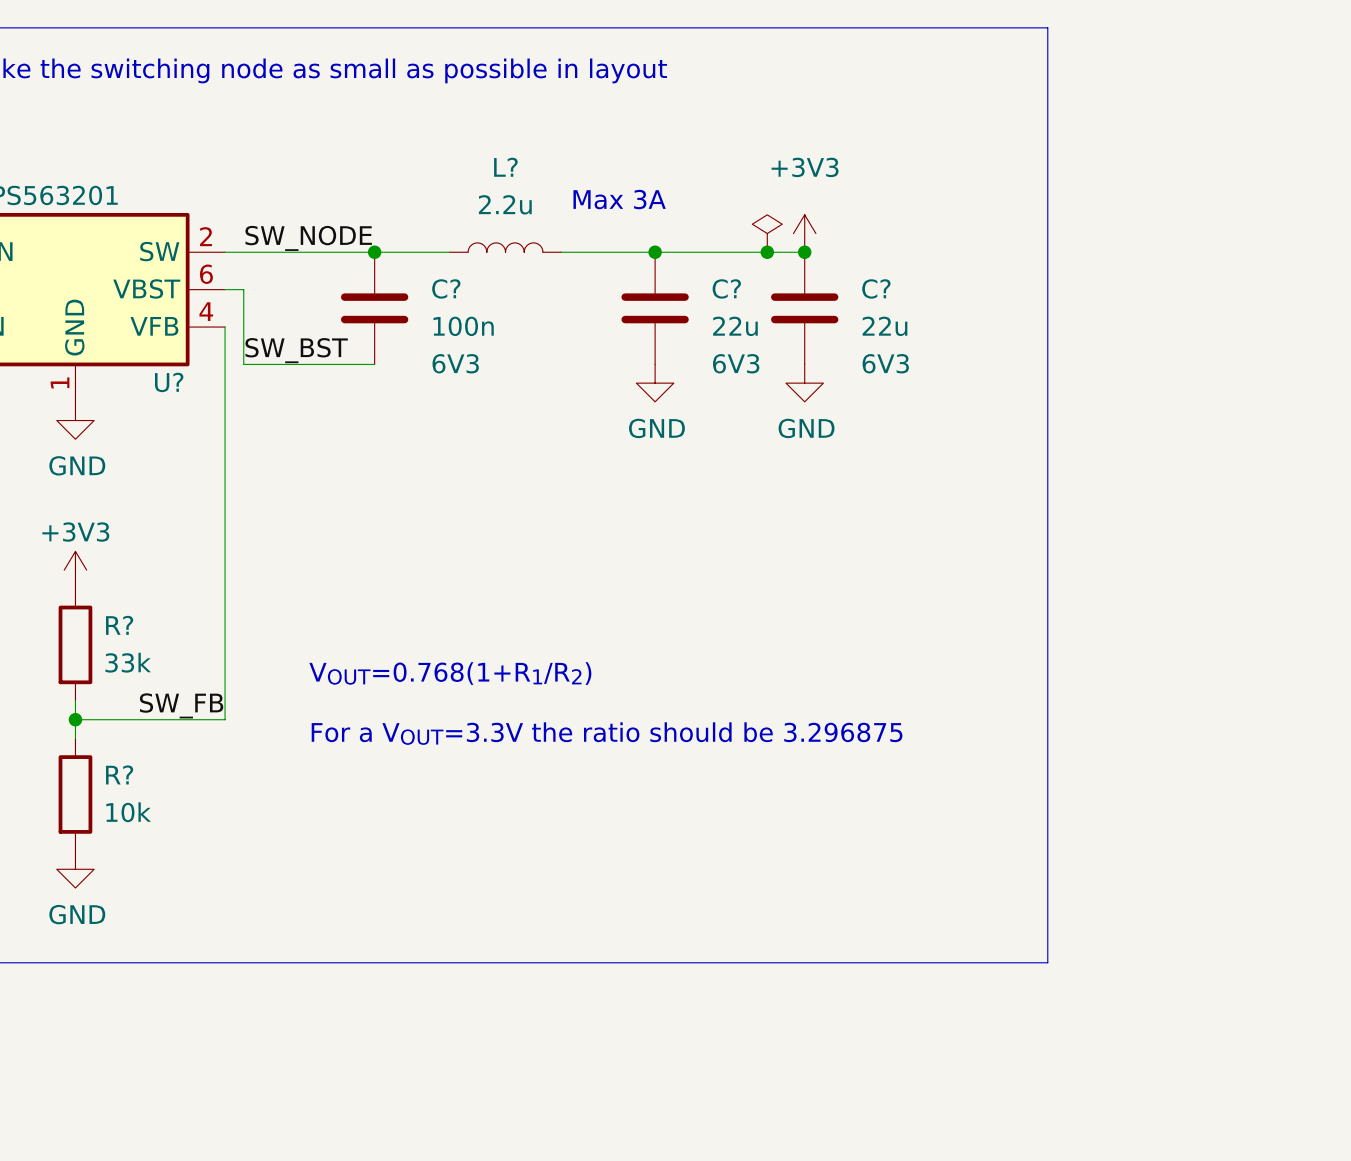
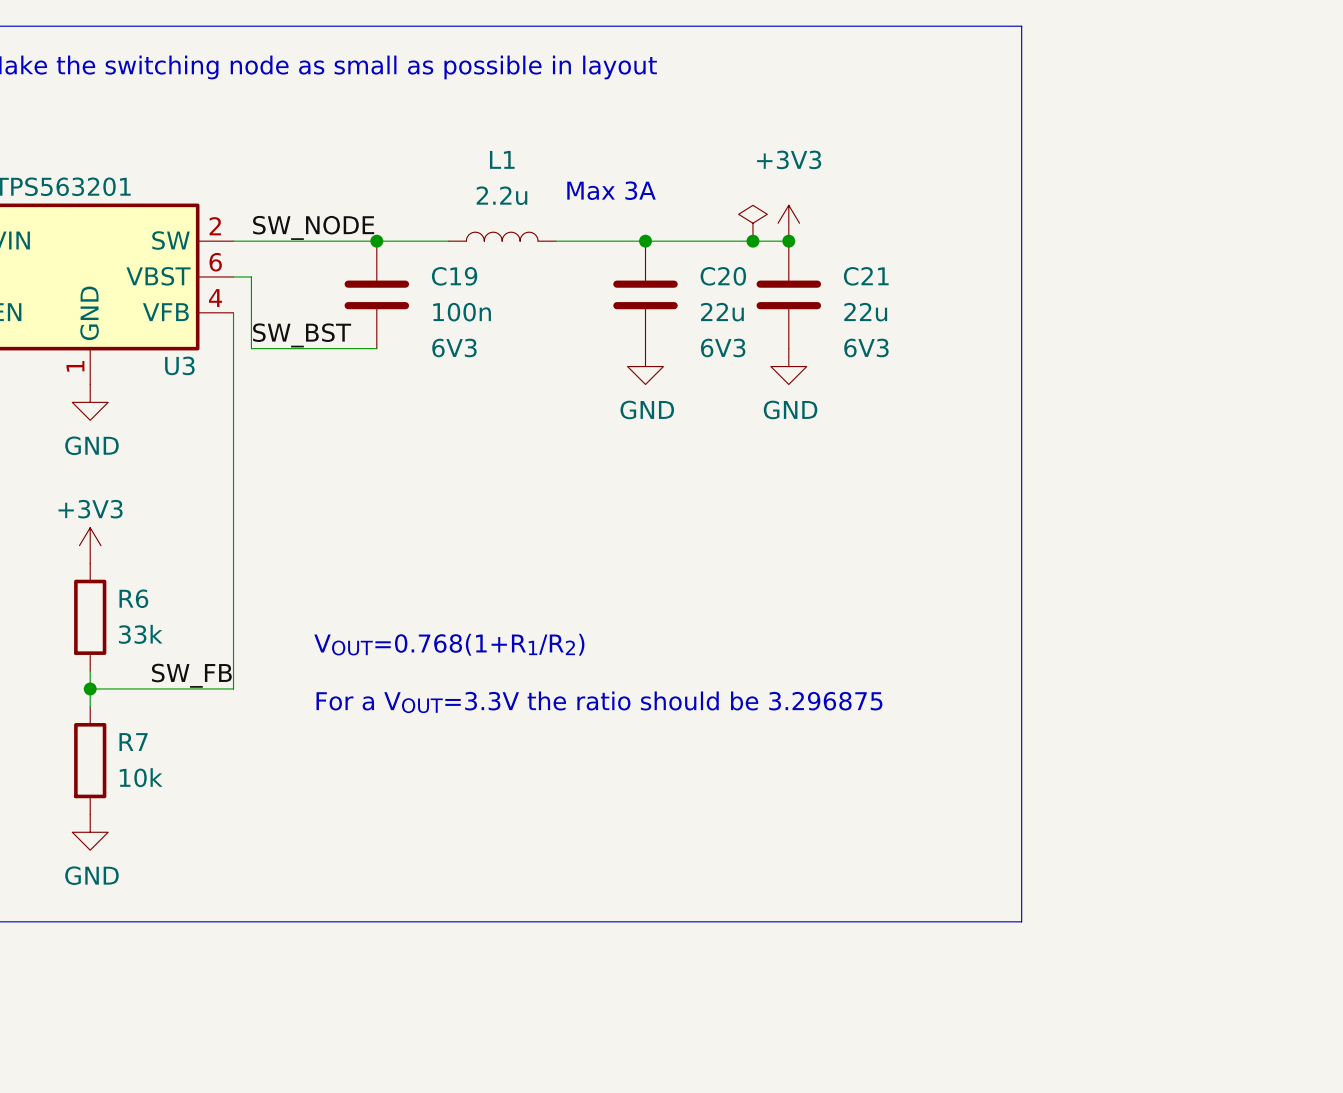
L? name: L? (505, 167) -> L1 (502, 159)
C? name: C? (446, 288) -> C19 (454, 276)
C? name: C? (726, 288) -> C20 (723, 276)
C? name: C? (876, 288) -> C21 (866, 276)
U? name: U? (169, 382) -> U3 (179, 365)
R? name: R? (119, 625) -> R6 (133, 598)
R? name: R? (119, 774) -> R7 (133, 742)

